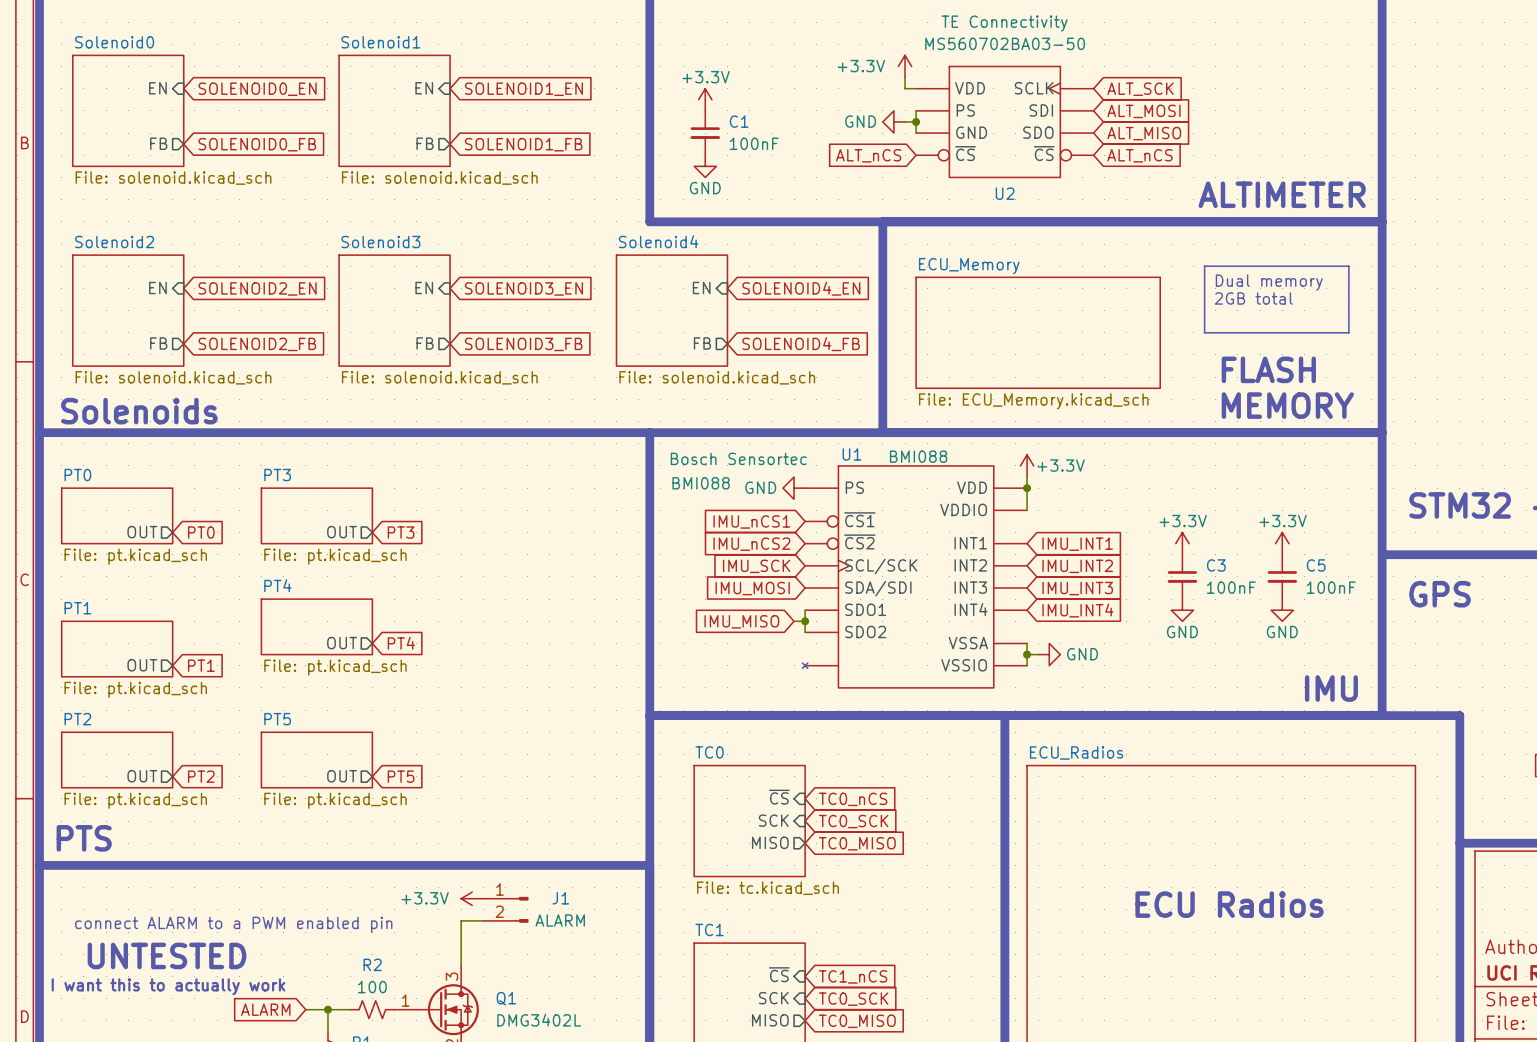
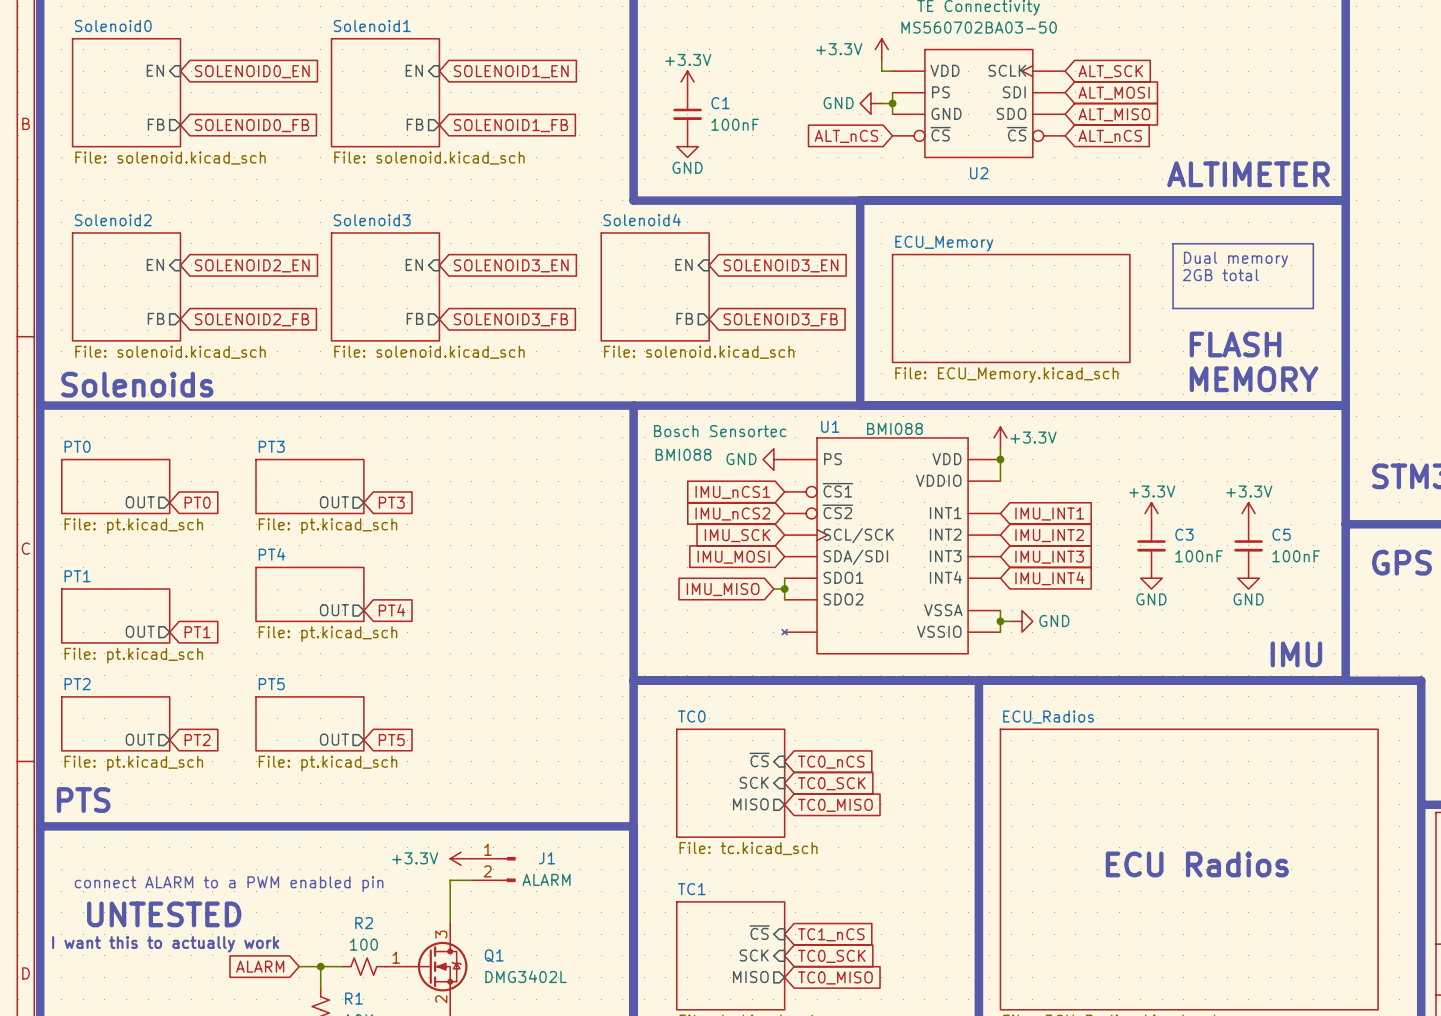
global label: SOLENOID4_EN (801, 288) -> SOLENOID3_EN (780, 265)
global label: SOLENOID4_FB (801, 344) -> SOLENOID3_FB (780, 319)

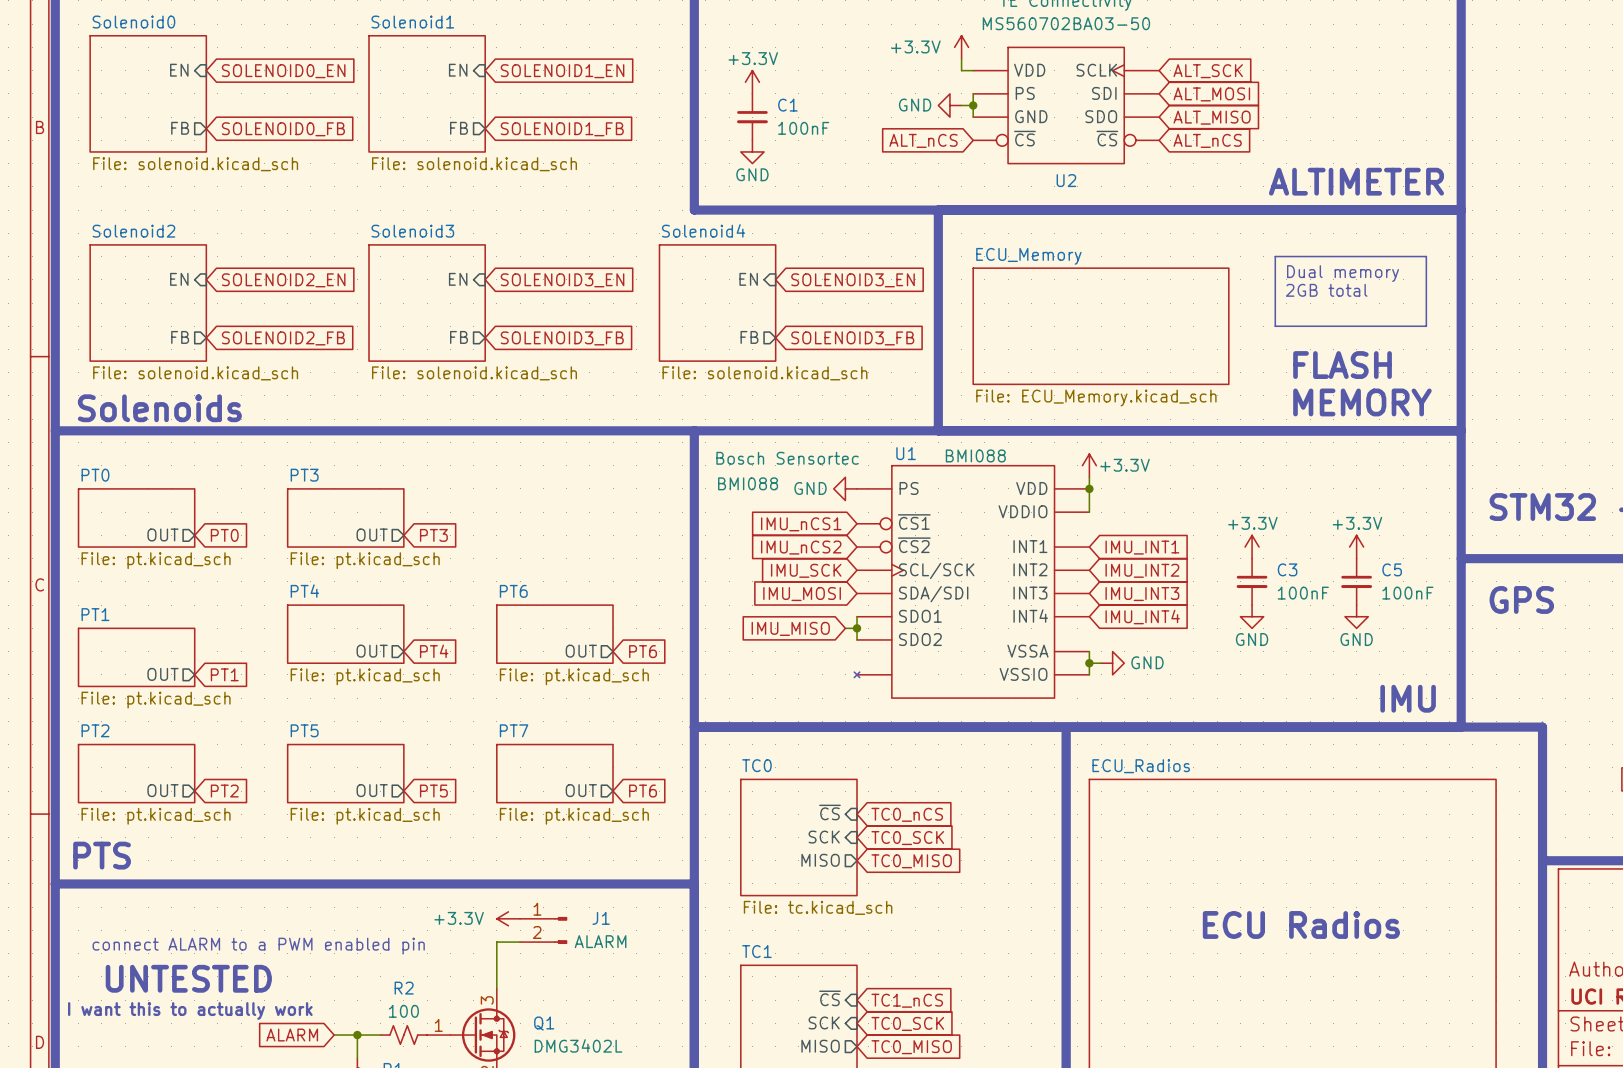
sheet PT6: none -> File: pt.kicad_sch (554, 634)
sheet pin: none -> OUT (581, 651)
global label: none -> PT6 (643, 651)
sheet PT7: none -> File: pt.kicad_sch (554, 773)
sheet pin: none -> OUT (581, 790)
global label: none -> PT6 (643, 791)

